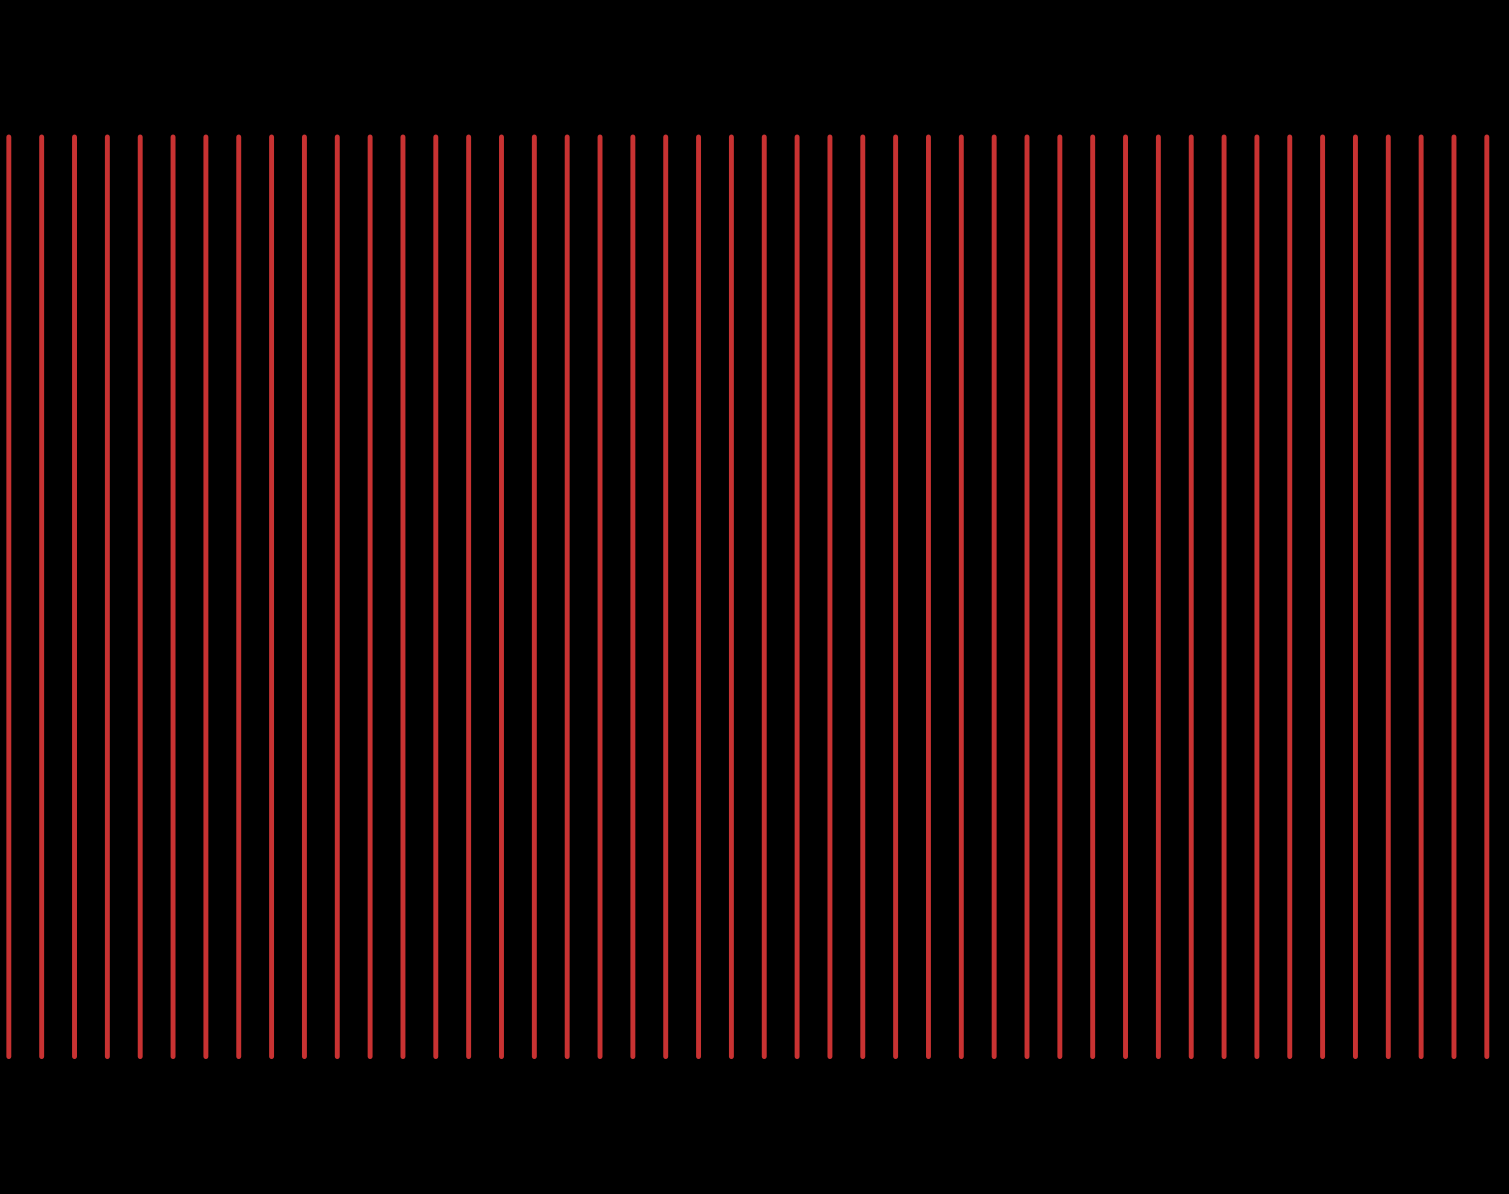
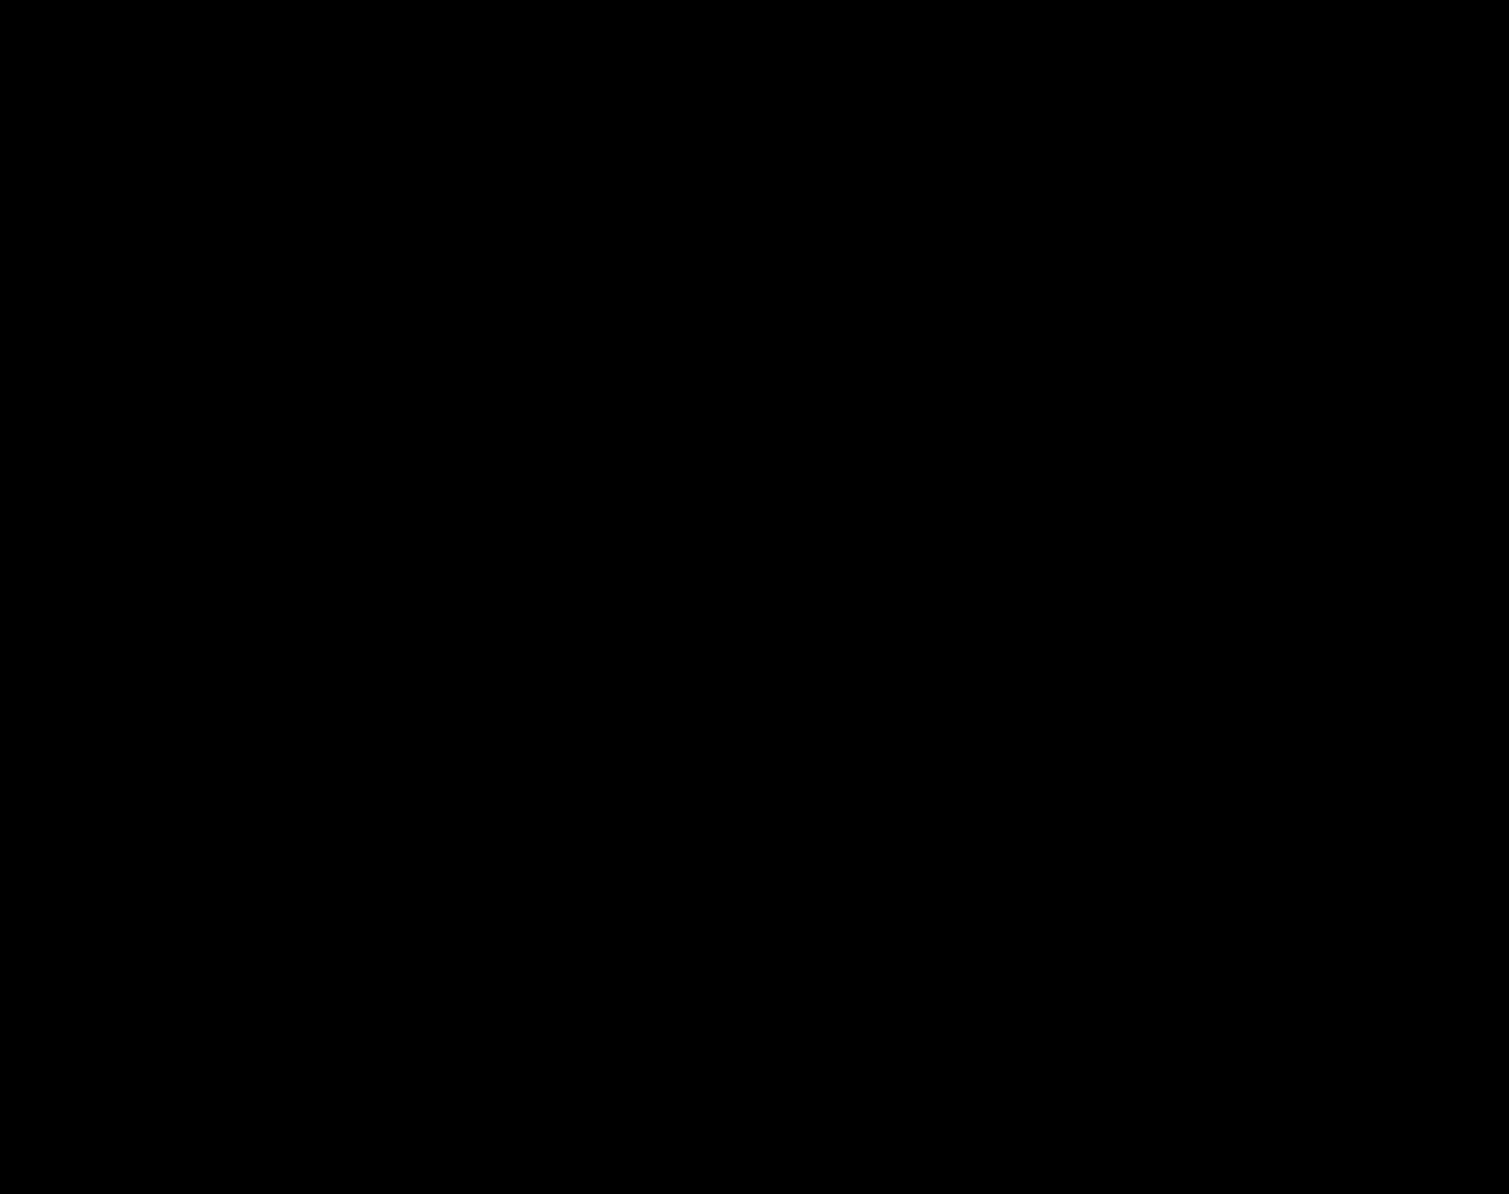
track: (8, 136) (8, 1056) -> none
track: (41, 136) (41, 1056) -> none
track: (74, 136) (74, 1056) -> none
track: (107, 136) (107, 1056) -> none
track: (140, 136) (140, 1056) -> none
track: (173, 136) (173, 1056) -> none
track: (205, 136) (205, 1056) -> none
track: (238, 136) (238, 1056) -> none
track: (271, 136) (271, 1056) -> none
track: (304, 136) (304, 1056) -> none
track: (337, 136) (337, 1056) -> none
track: (370, 136) (370, 1056) -> none
track: (402, 136) (402, 1056) -> none
track: (435, 136) (435, 1056) -> none
track: (468, 136) (468, 1056) -> none
track: (501, 136) (501, 1056) -> none
track: (534, 136) (534, 1056) -> none
track: (567, 136) (567, 1056) -> none
track: (600, 136) (600, 1056) -> none
track: (632, 136) (632, 1056) -> none
track: (665, 136) (665, 1056) -> none
track: (698, 136) (698, 1056) -> none
track: (731, 136) (731, 1056) -> none
track: (764, 136) (764, 1056) -> none
track: (797, 136) (797, 1056) -> none
track: (829, 136) (829, 1056) -> none
track: (862, 136) (862, 1056) -> none
track: (895, 136) (895, 1056) -> none
track: (928, 136) (928, 1056) -> none
track: (961, 136) (961, 1056) -> none
track: (994, 136) (994, 1056) -> none
track: (1027, 136) (1027, 1056) -> none
track: (1059, 136) (1059, 1056) -> none
track: (1092, 136) (1092, 1056) -> none
track: (1125, 136) (1125, 1056) -> none
track: (1158, 136) (1158, 1056) -> none
track: (1191, 136) (1191, 1056) -> none
track: (1224, 136) (1224, 1056) -> none
track: (1256, 136) (1256, 1056) -> none
track: (1289, 136) (1289, 1056) -> none
track: (1322, 136) (1322, 1056) -> none
track: (1355, 136) (1355, 1056) -> none
track: (1388, 136) (1388, 1056) -> none
track: (1421, 136) (1421, 1056) -> none
track: (1453, 136) (1453, 1056) -> none
track: (1486, 136) (1486, 1056) -> none

